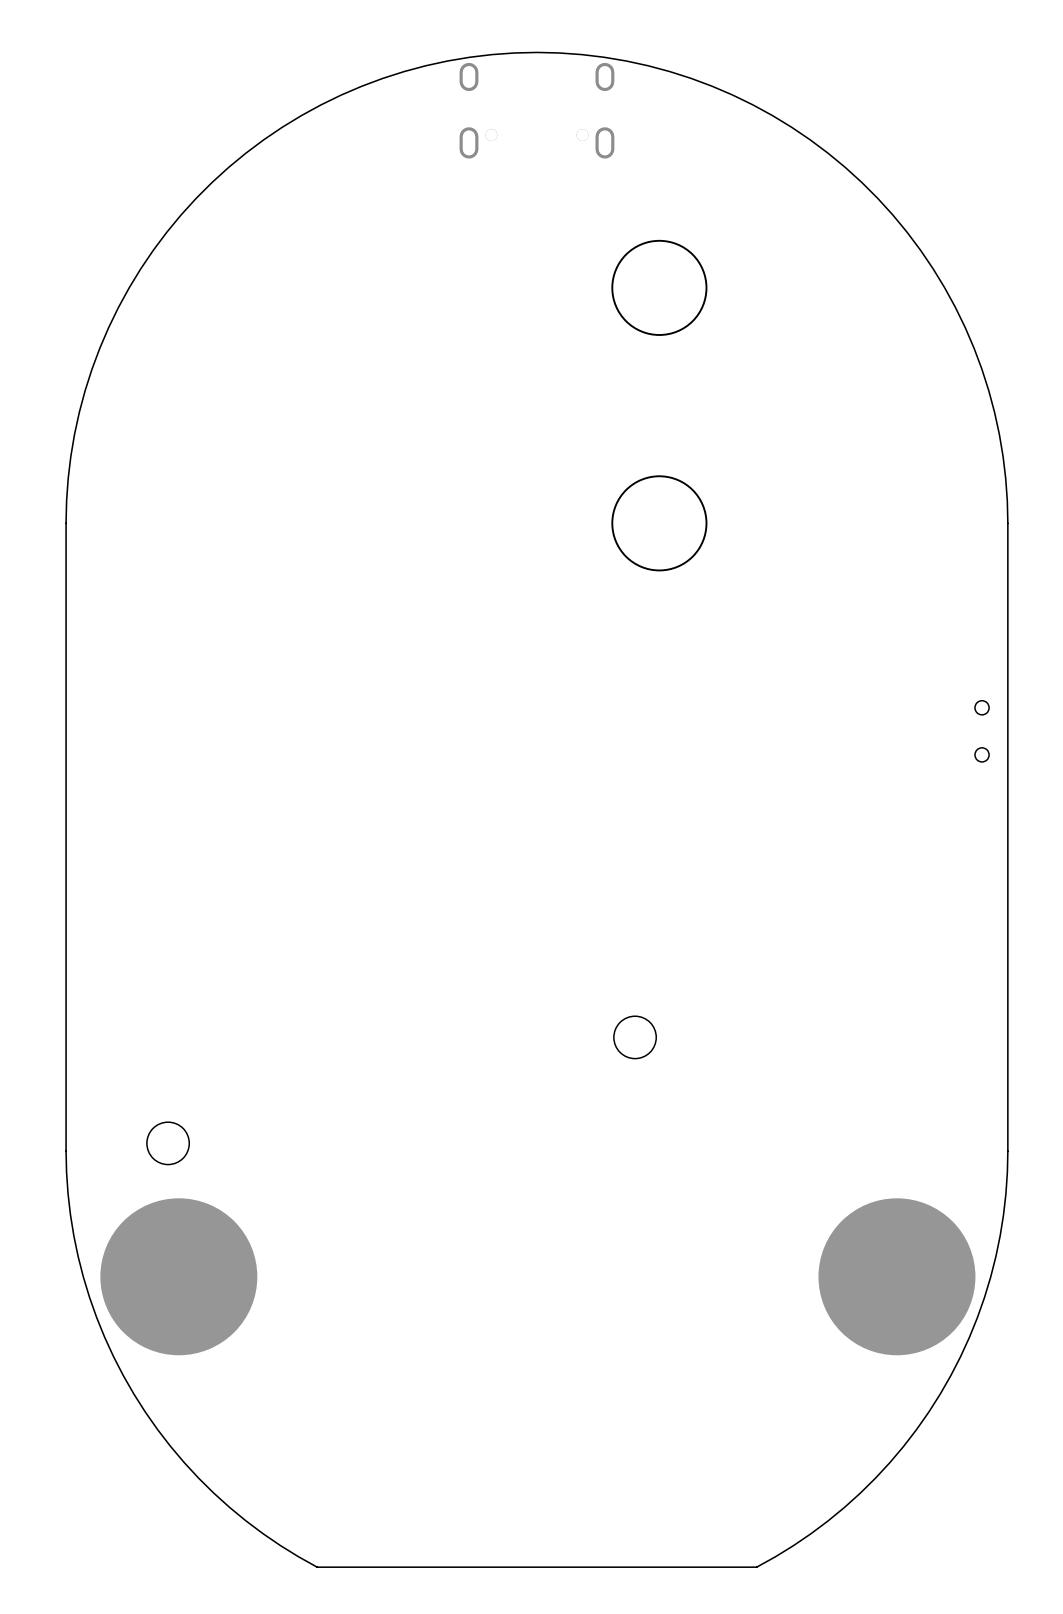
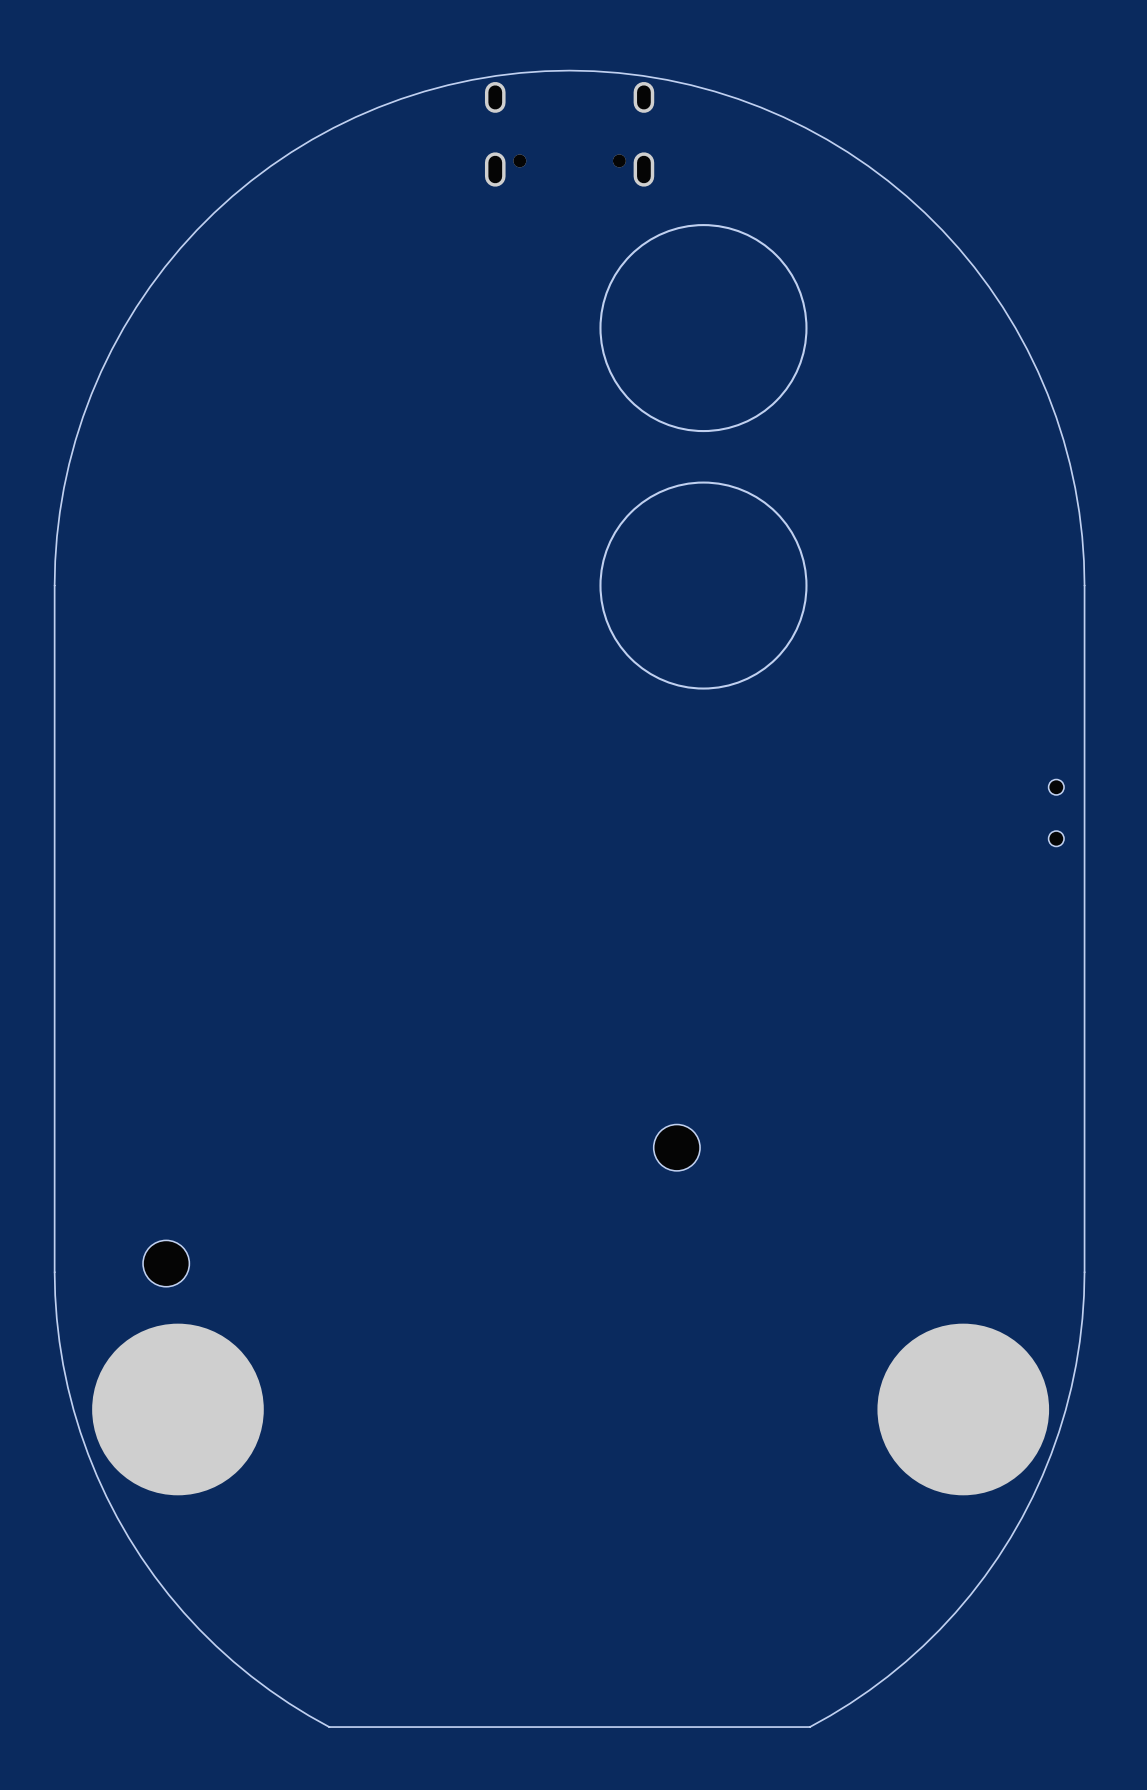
drawing shape: [611, 239, 708, 572] -> [599, 224, 808, 690]

